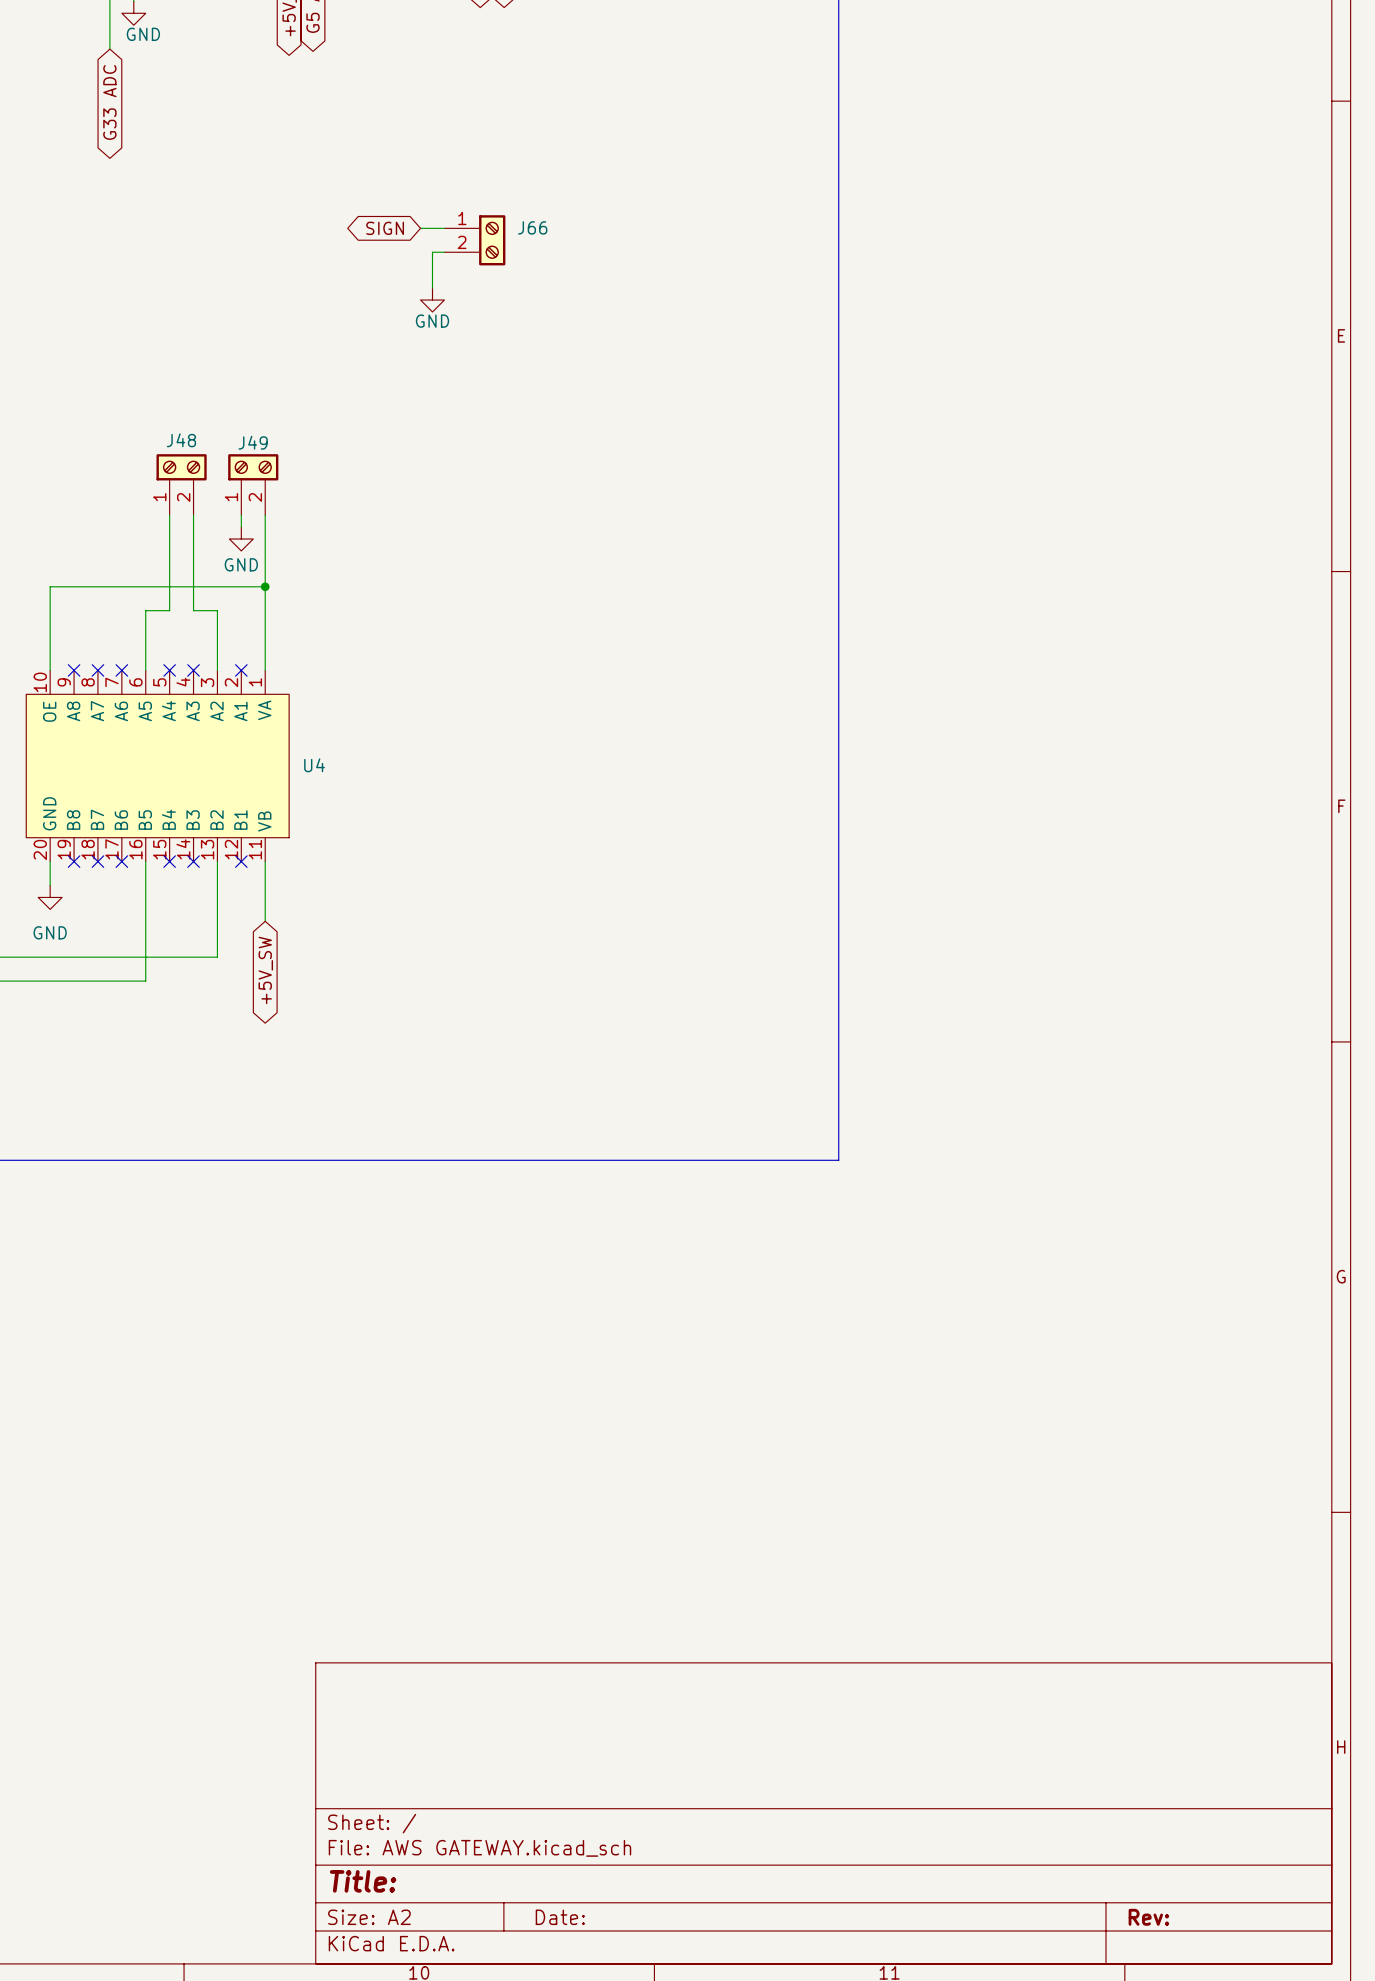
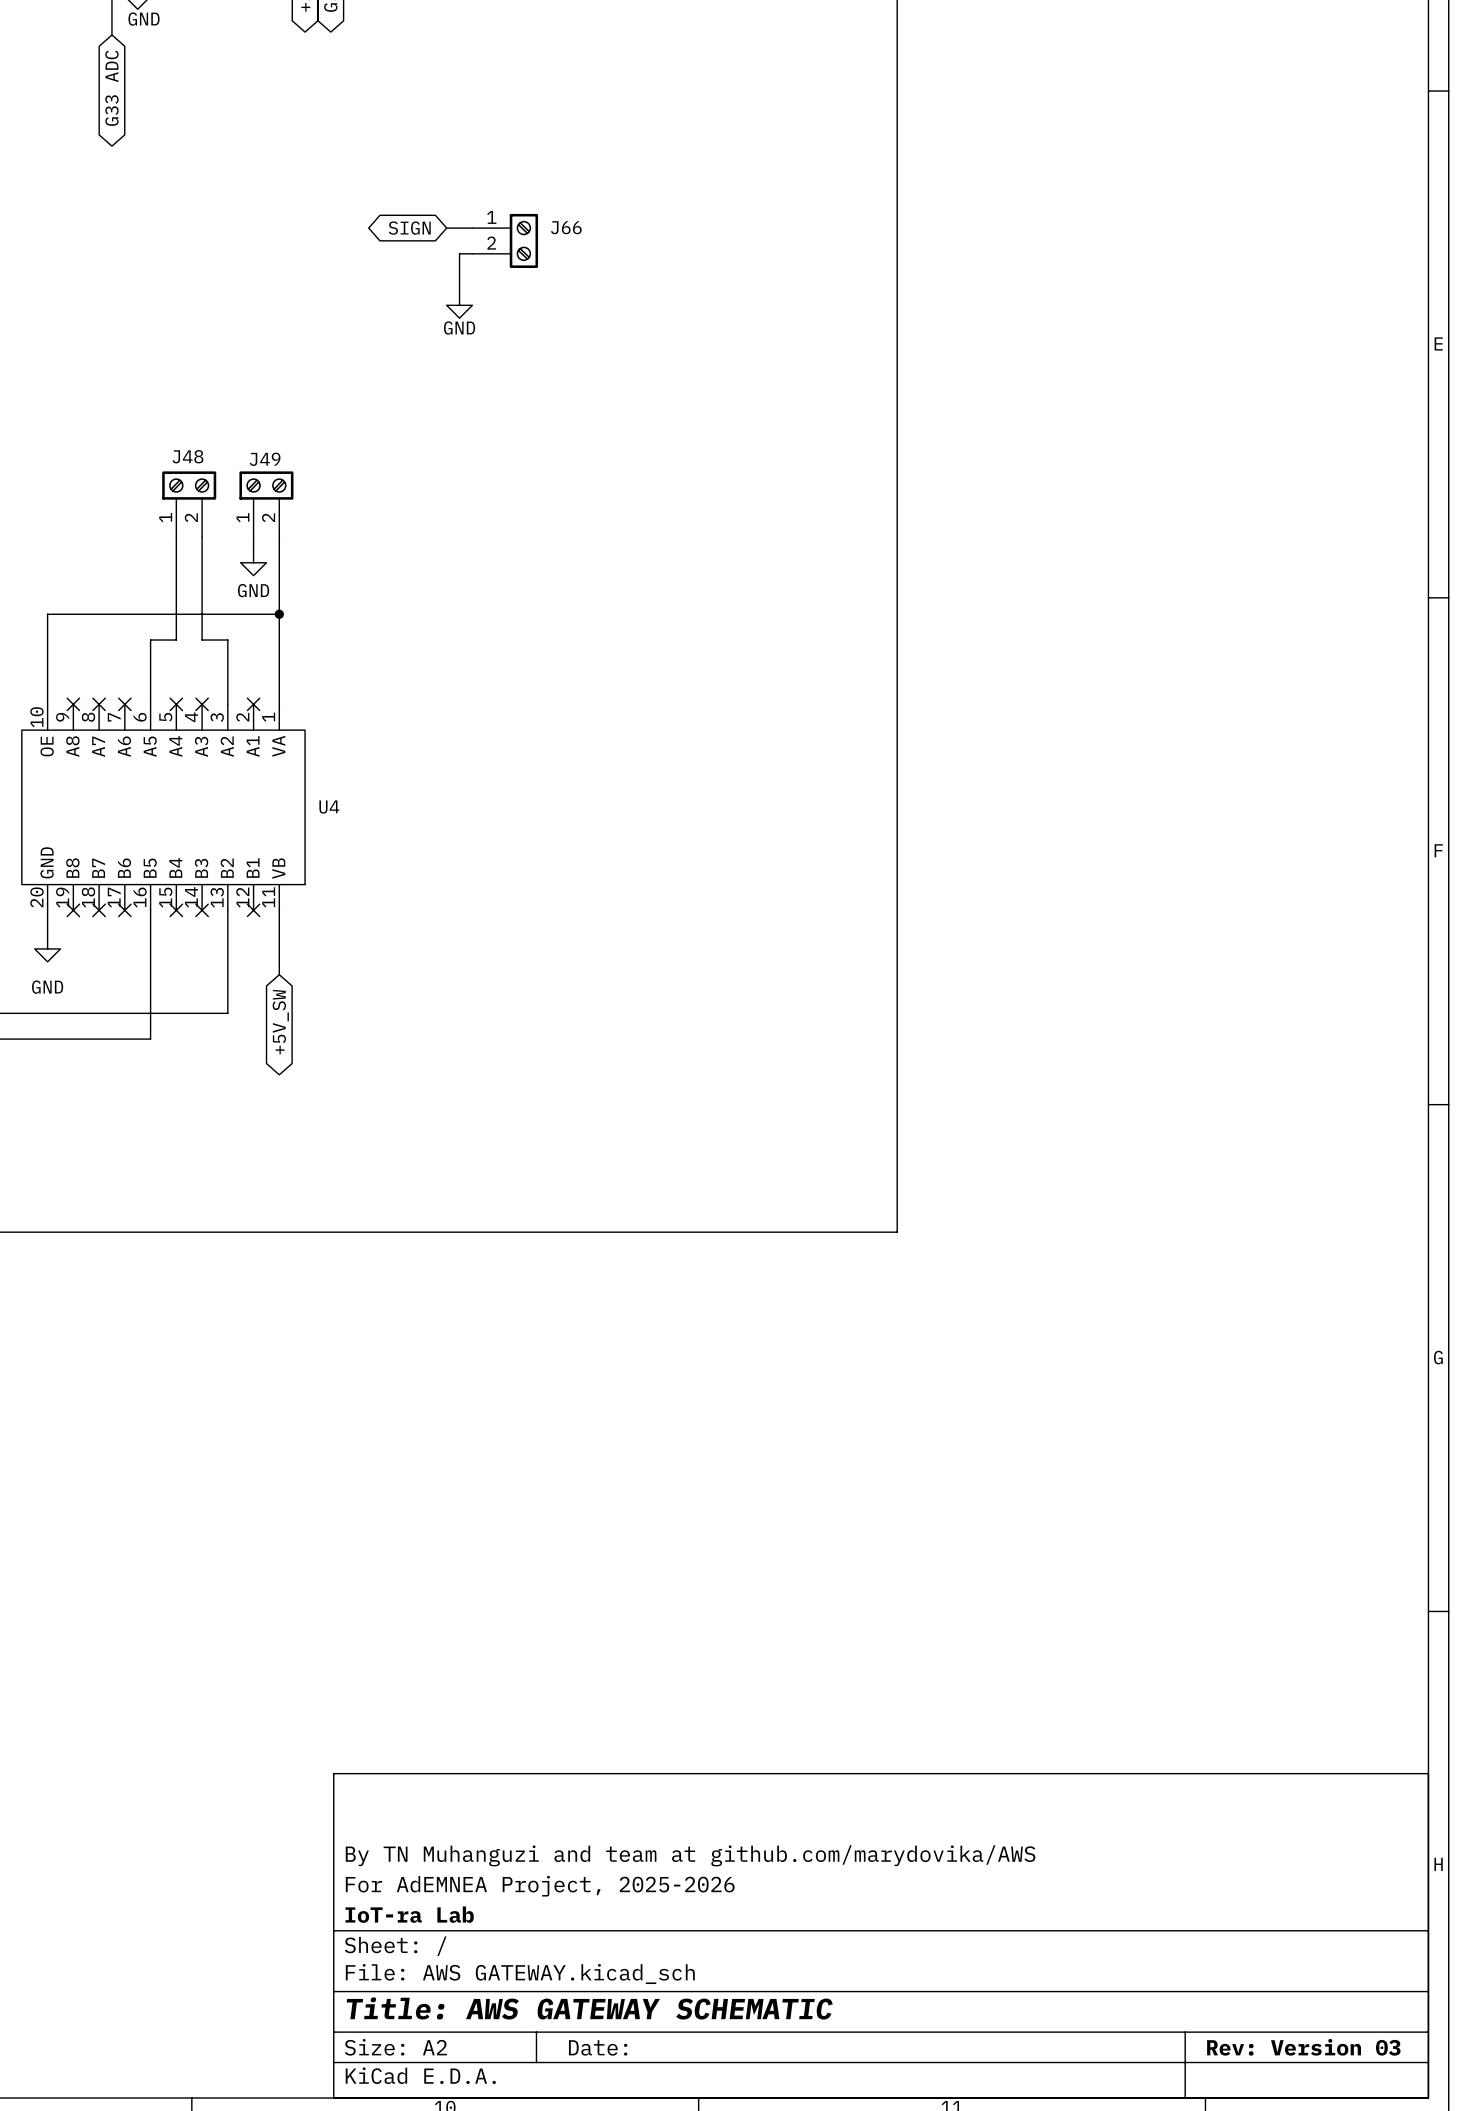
title block: none -> By TN Muhanguzi and team at github.com/marydovika/AWS (690, 1855)
title block: none -> For AdEMNEA Project, 2025-2026 (540, 1886)
title block: none -> IoT-ra Lab (409, 1914)
title block: Title: (363, 1881) -> Title: AWS GATEWAY SCHEMATIC (589, 2008)
title block: Rev: (1148, 1917) -> Rev: Version 03 (1303, 2047)

